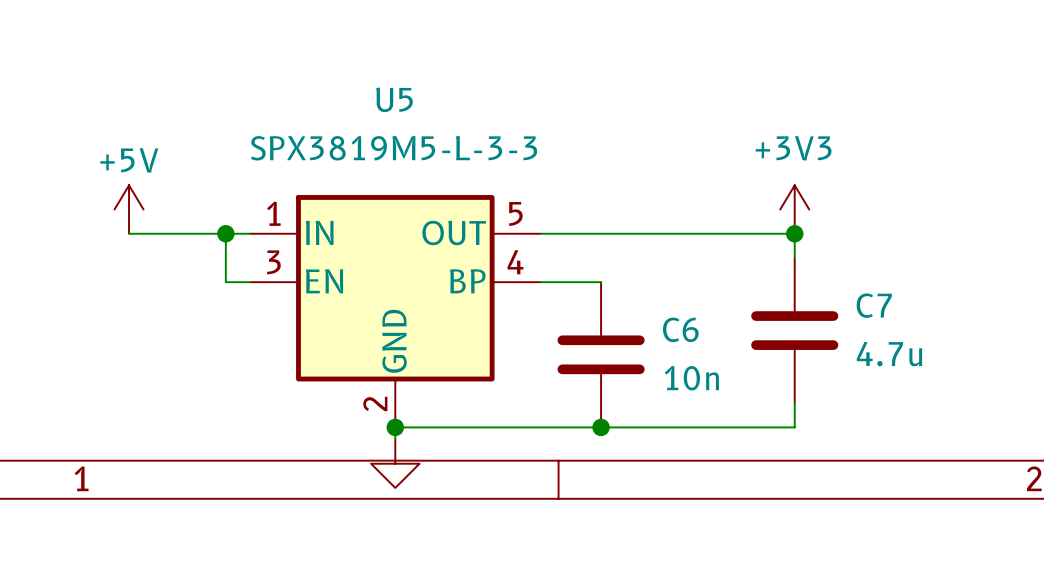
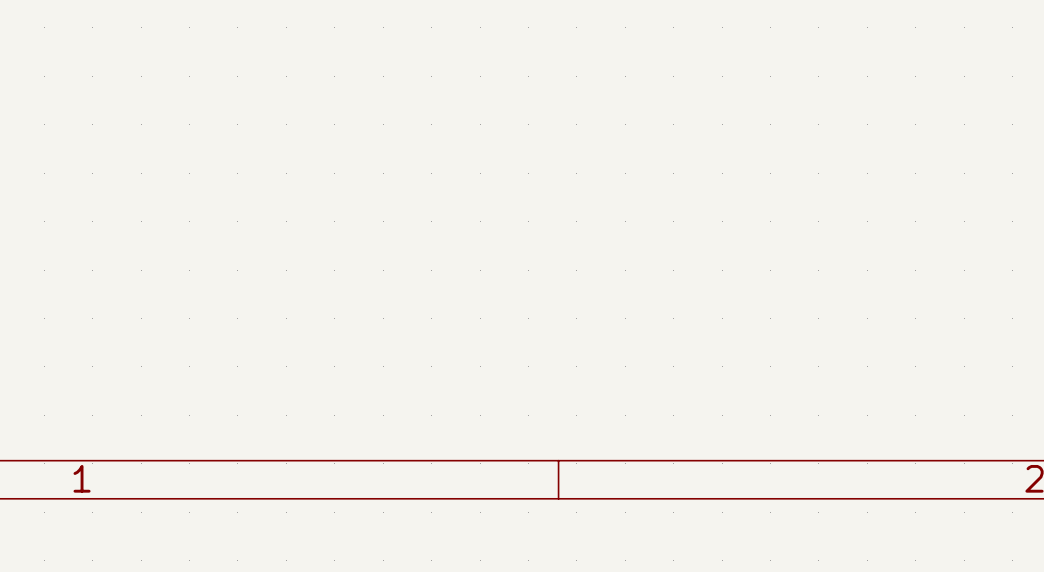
power symbol: +5V (129, 209) -> none
power symbol: +3V3 (794, 209) -> none
wire: (129, 233) (250, 233) -> none
wire: (225, 233) (225, 282) (250, 282) -> none
junction: (225, 233) -> none
wire: (540, 233) (794, 233) (794, 257) -> none
junction: (794, 233) -> none
wire: (540, 282) (601, 282) -> none
U5: SPX3819M5-L-3-3 (395, 311) -> none
C7: 4.7u (794, 330) -> none
C6: 10n (601, 354) -> none
wire: (794, 403) (794, 427) (395, 427) (395, 439) -> none
junction: (395, 427) -> none
junction: (601, 427) -> none
power symbol: (395, 463) -> none

